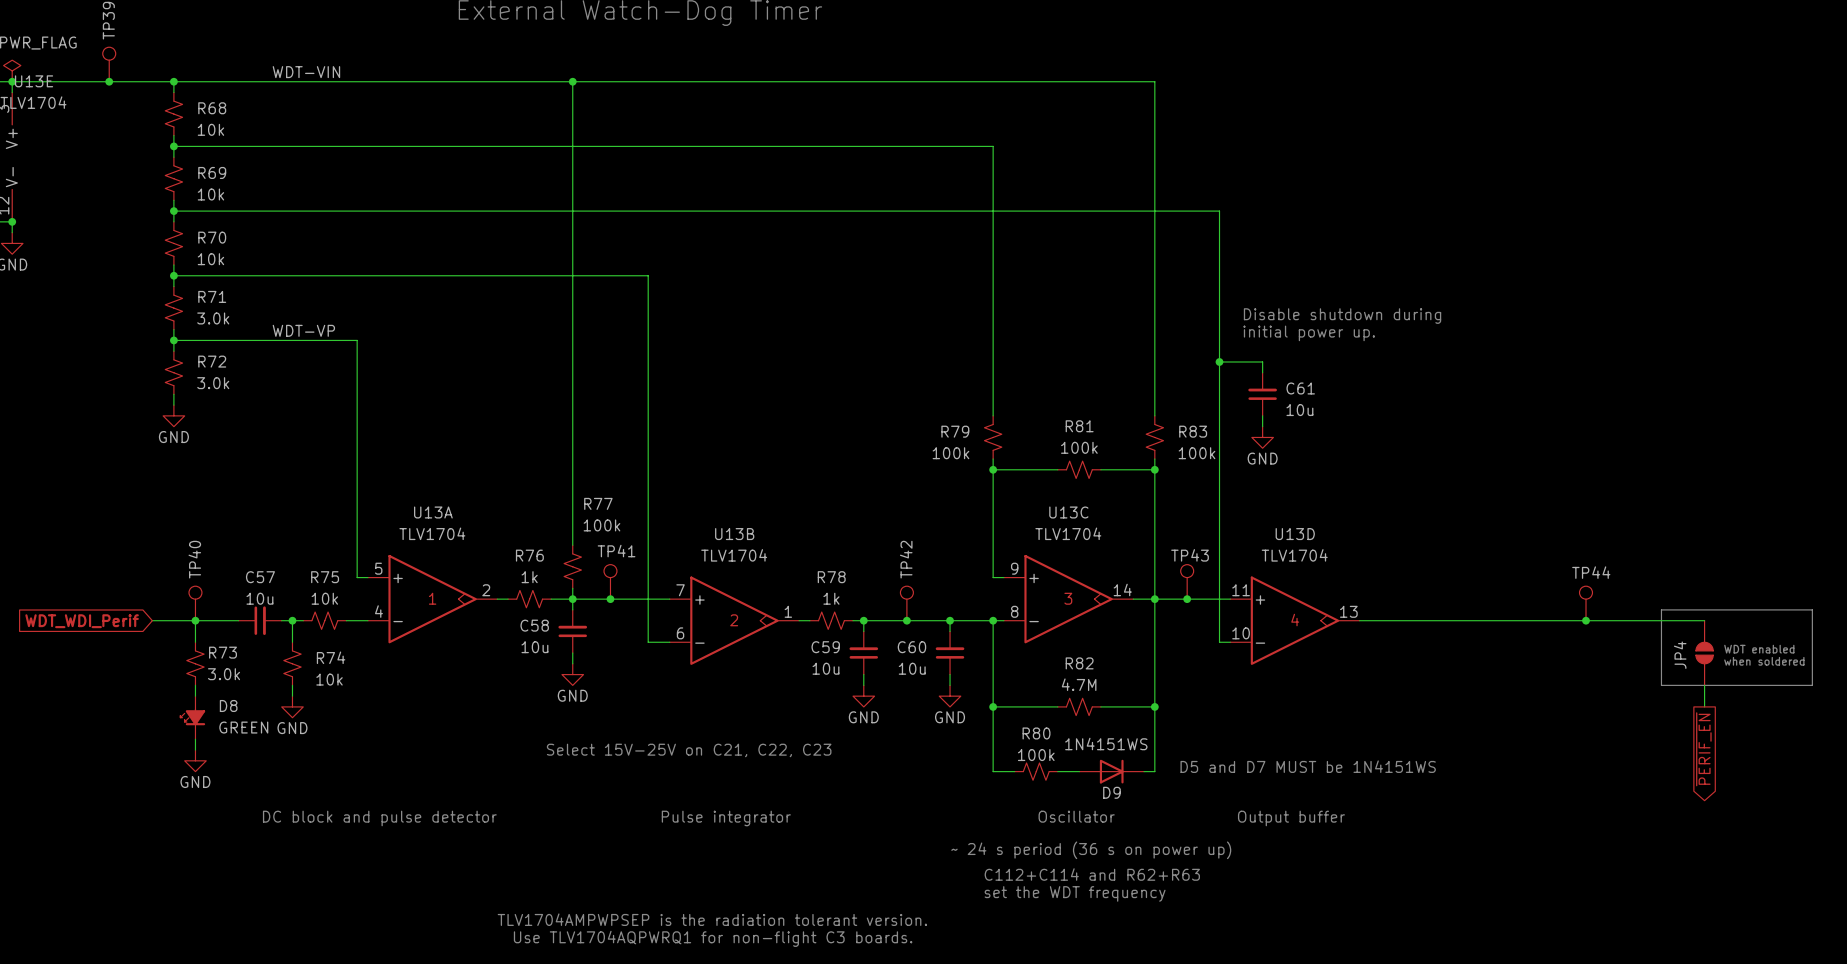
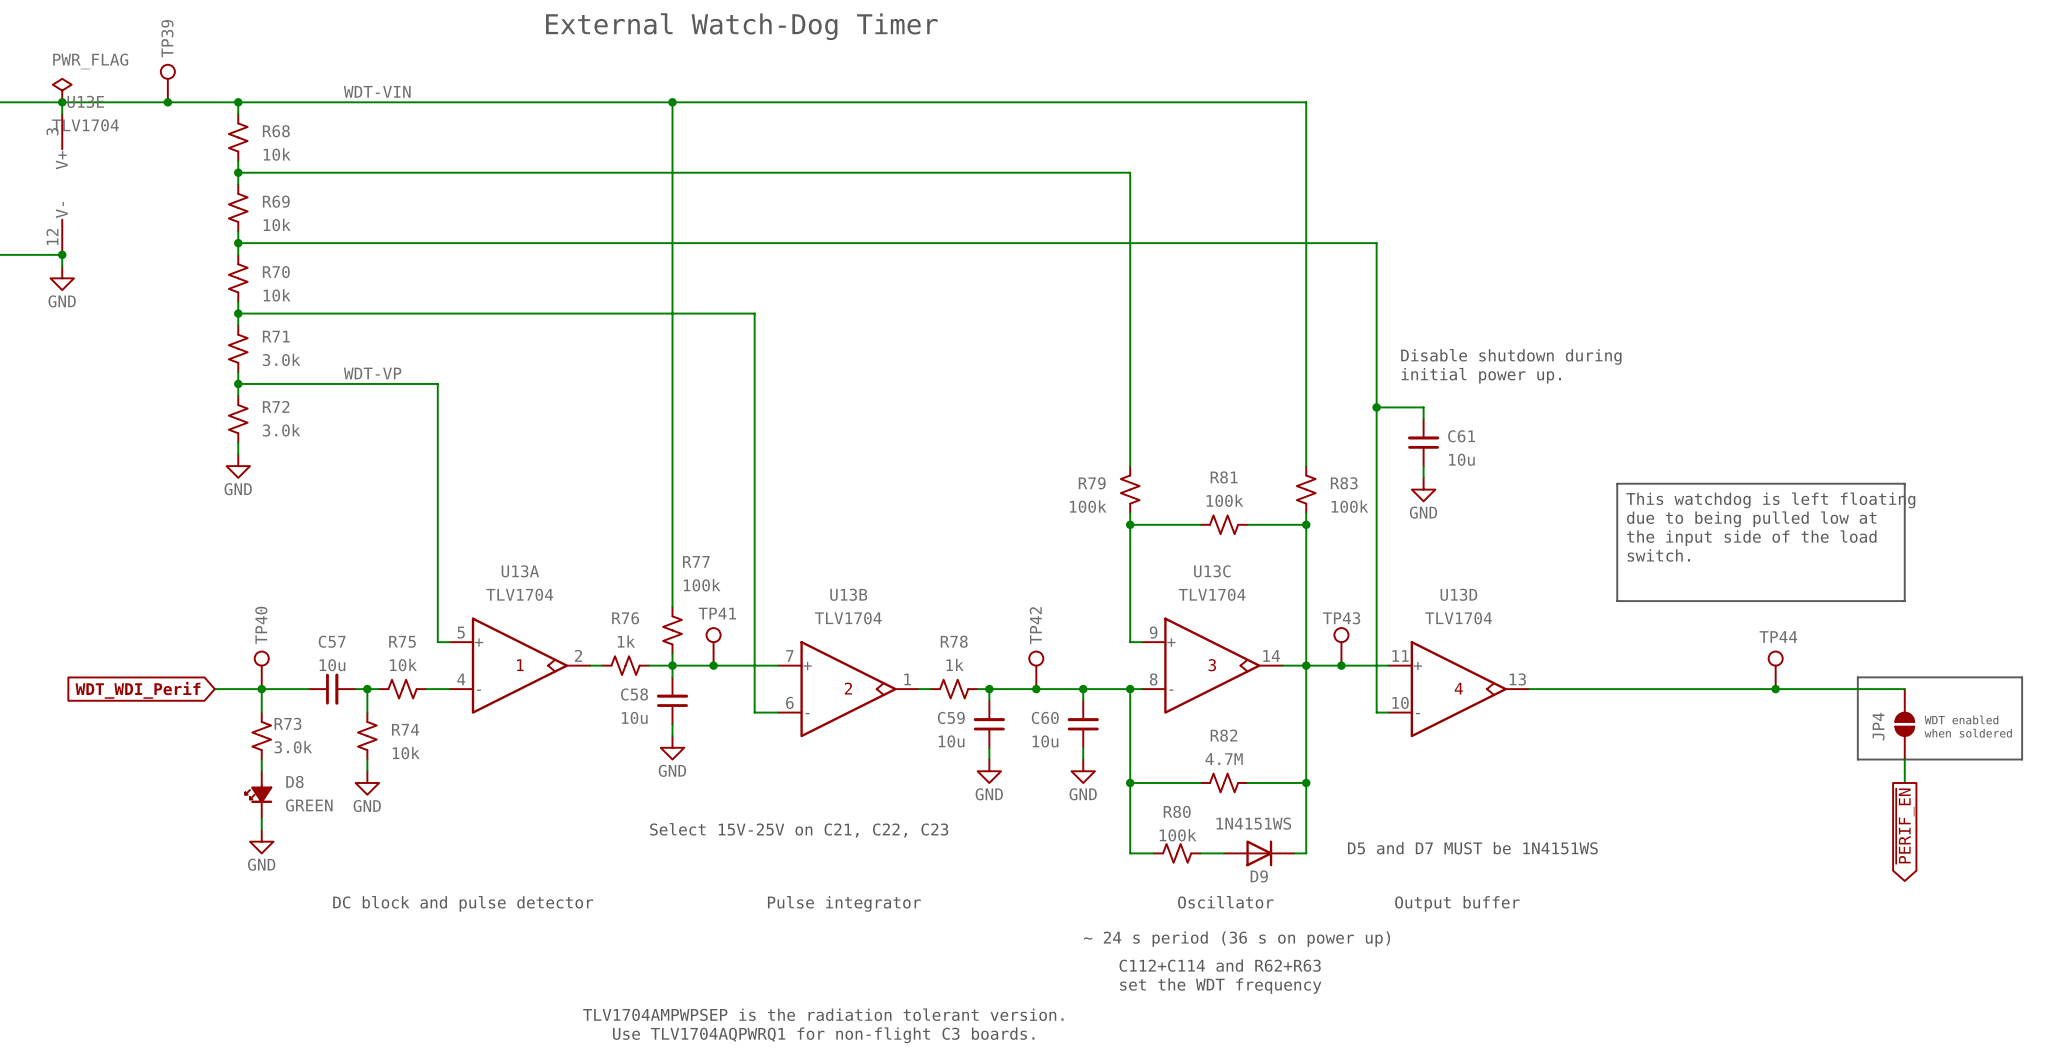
line: none -> (1617, 483) (1904, 483) (1904, 601) (1617, 601) (1617, 483)
text: none -> This watchdog is left floating (1770, 500)
text: none -> due to being pulled low at (1751, 519)
text: none -> the input side of the load (1751, 538)
text: none -> switch. (1658, 555)

